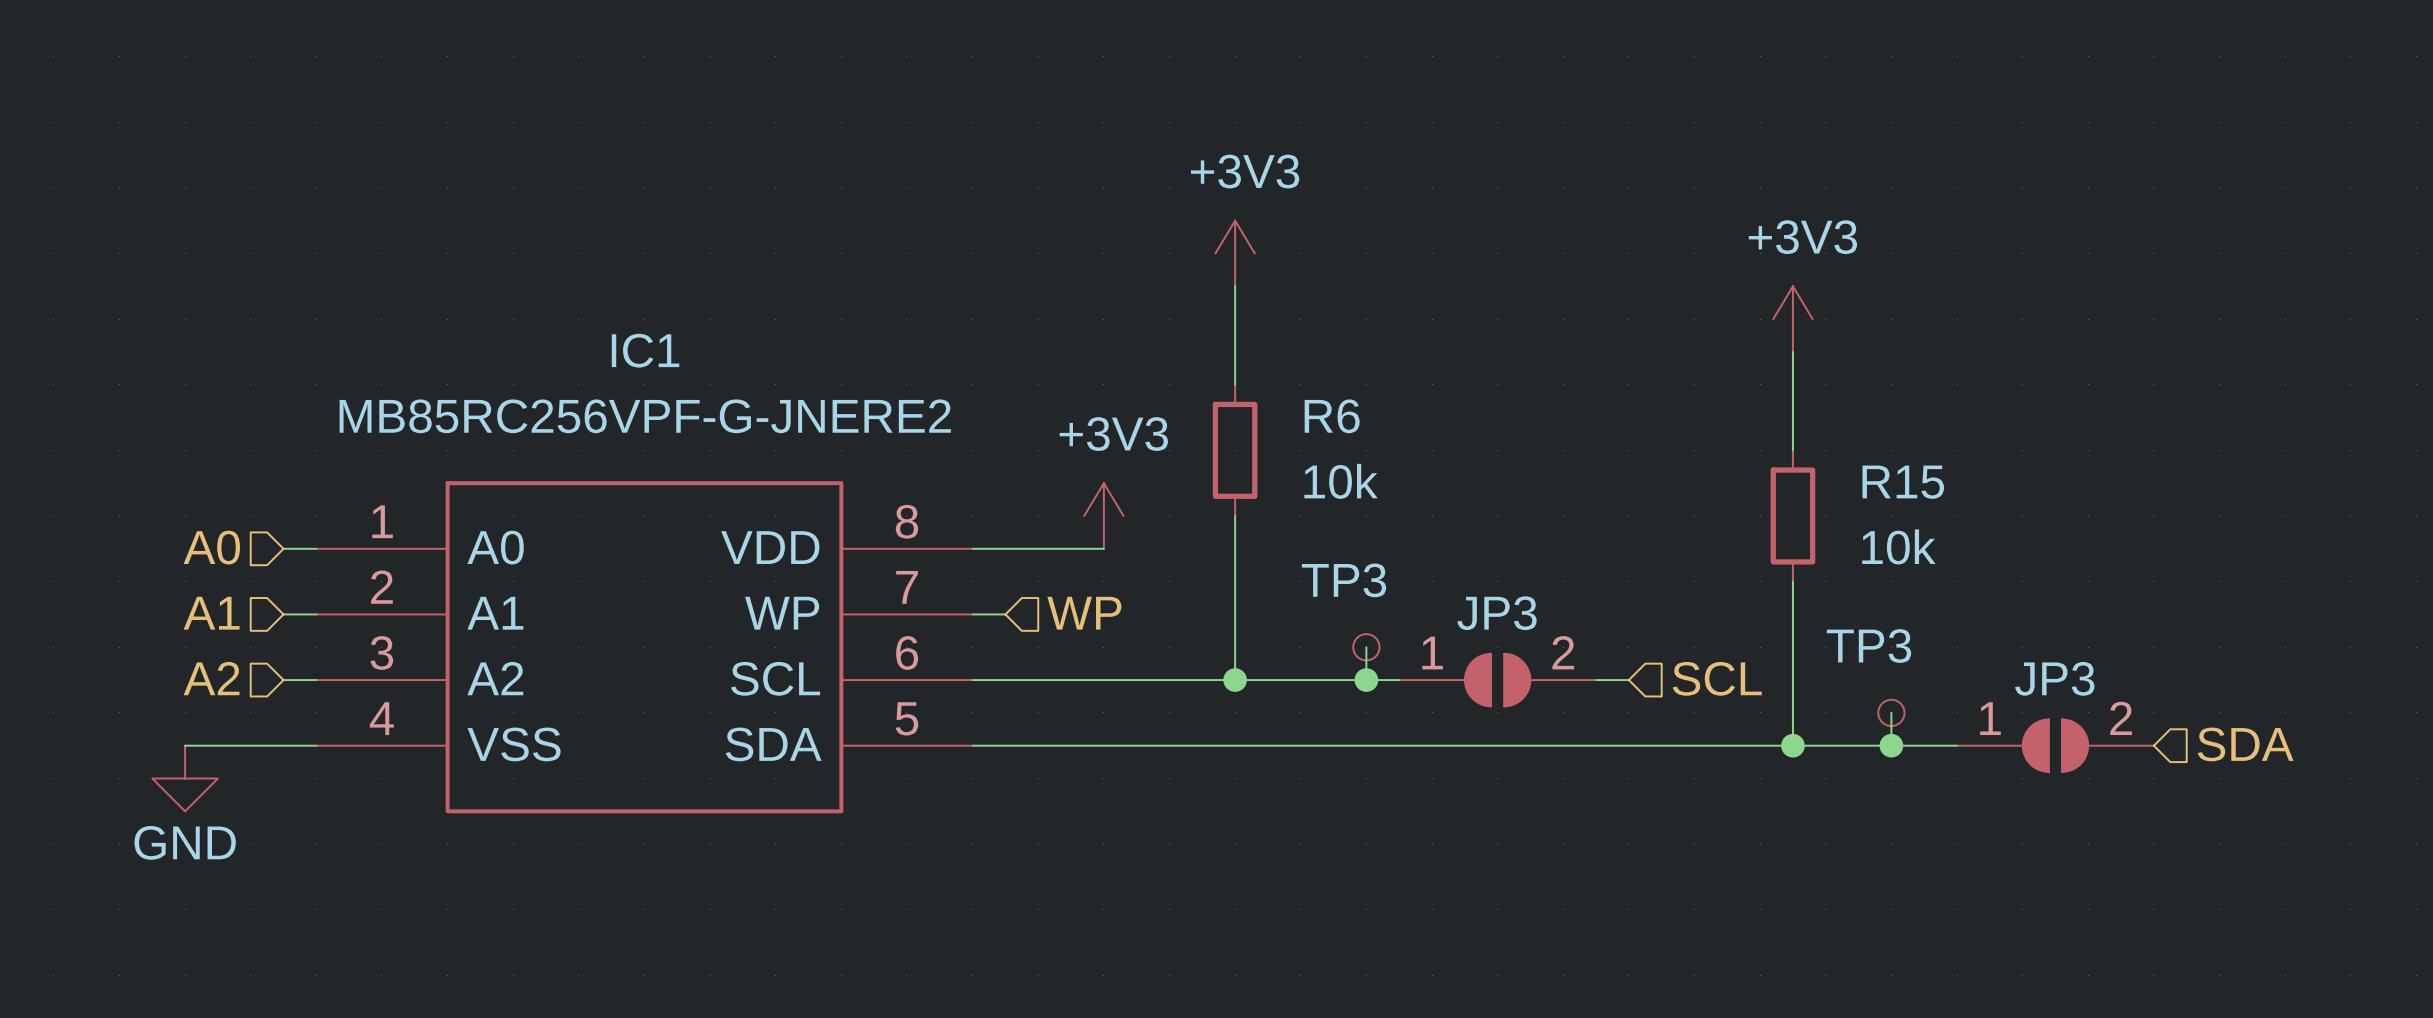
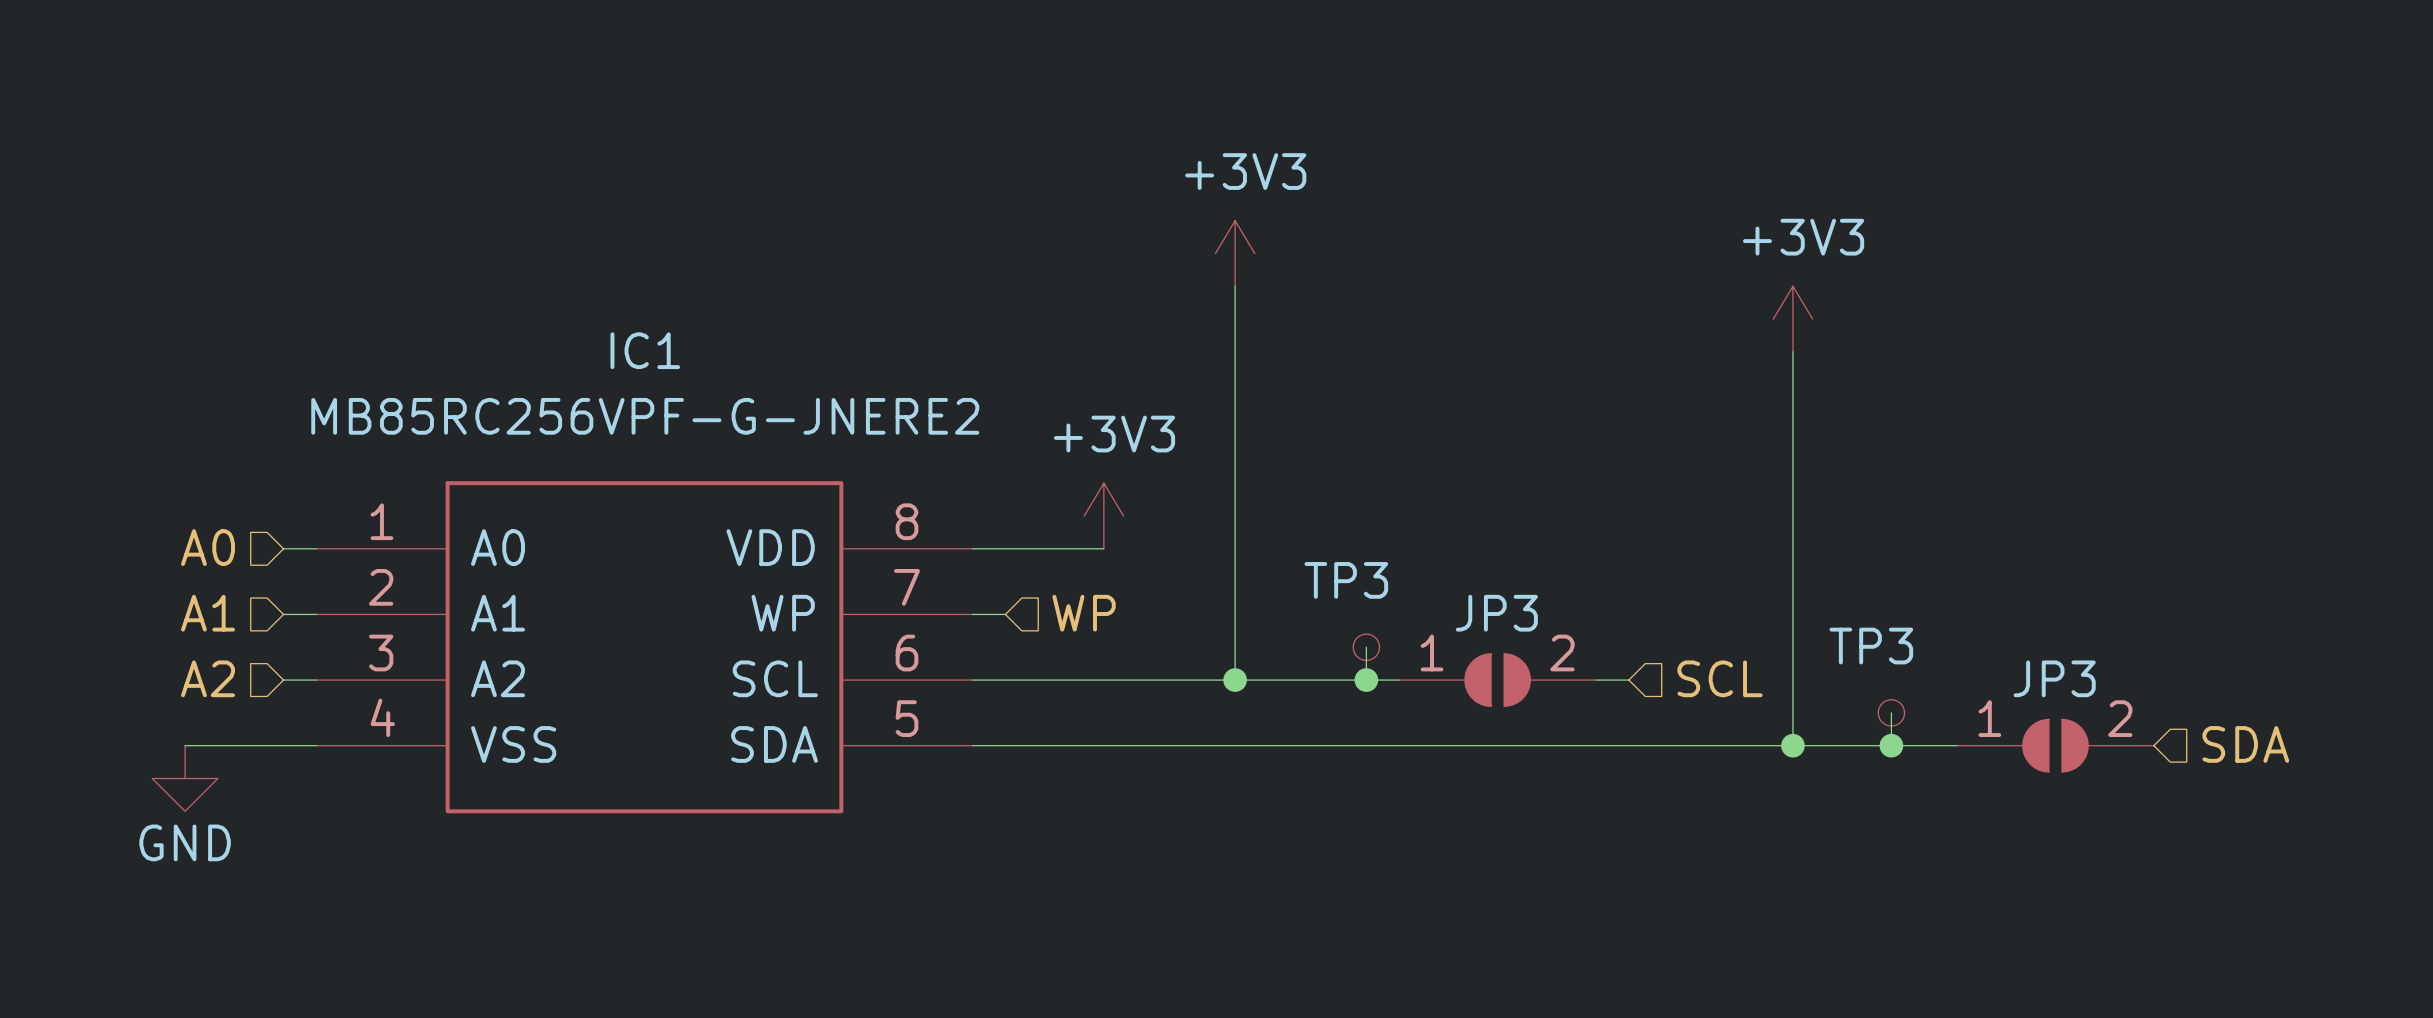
wire: none -> (1235, 384) (1235, 515)
R6: 10k (1235, 450) -> none
wire: none -> (1792, 450) (1792, 581)
R15: 10k (1792, 515) -> none

